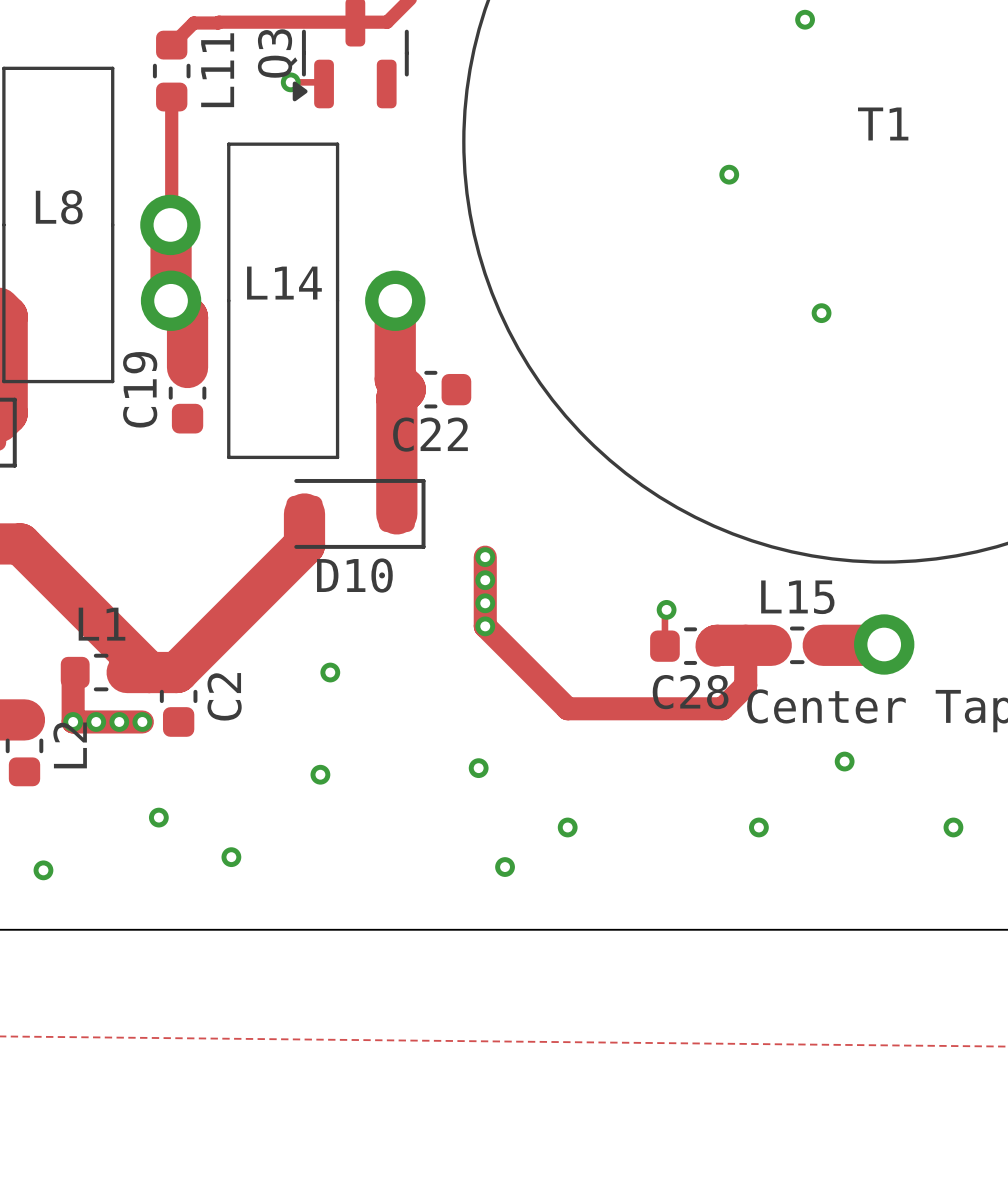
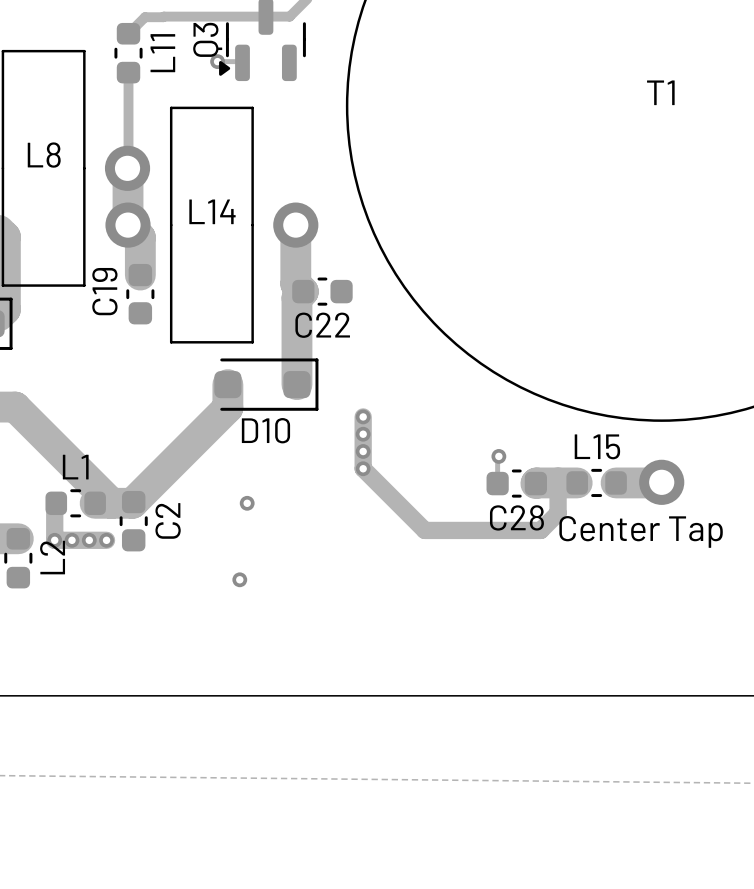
via: (805, 19) -> none
via: (729, 174) -> none
via: (821, 313) -> none
via: (844, 761) -> none
via: (478, 768) -> none
via: (158, 817) -> none
via: (567, 827) -> none
via: (758, 827) -> none
via: (953, 827) -> none
via: (231, 857) -> none
via: (505, 867) -> none
via: (43, 870) -> none

